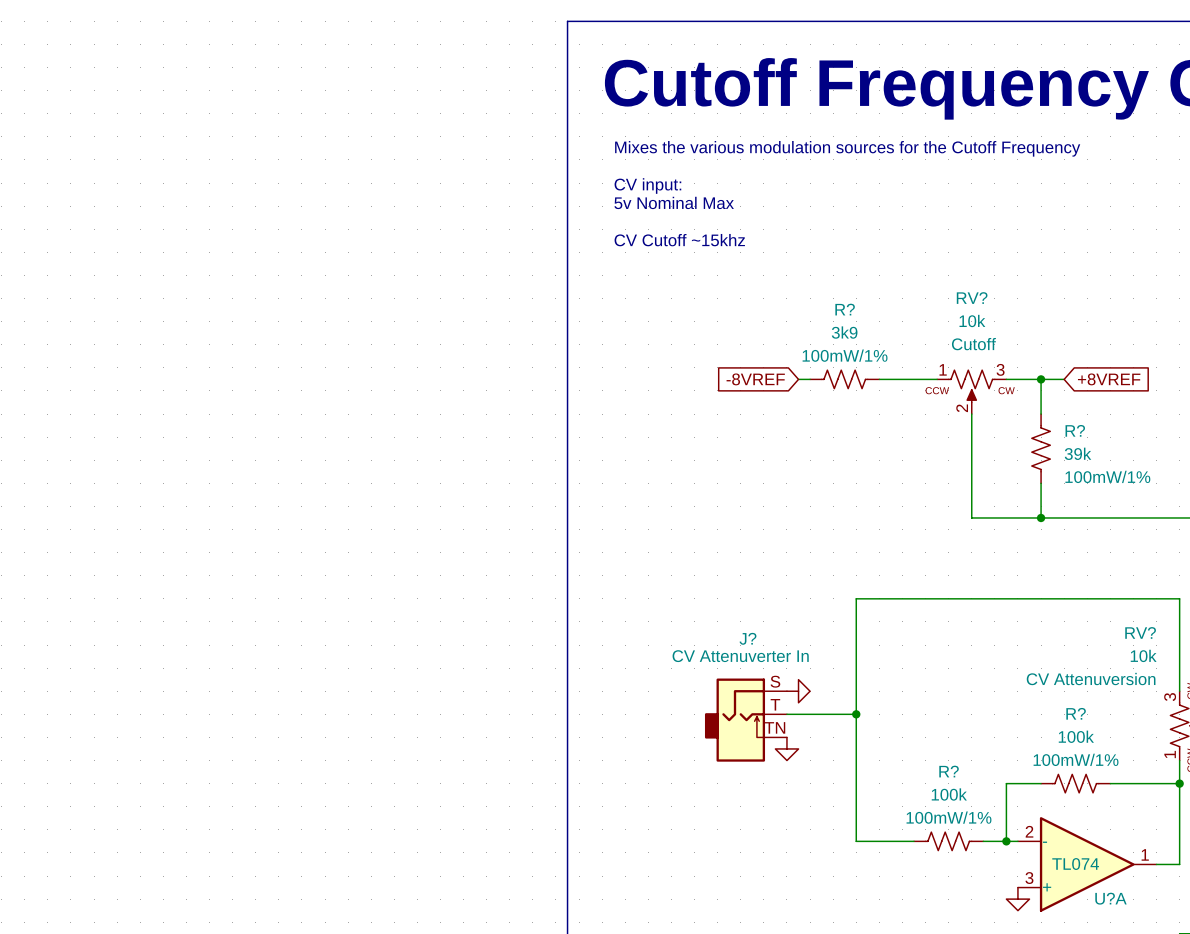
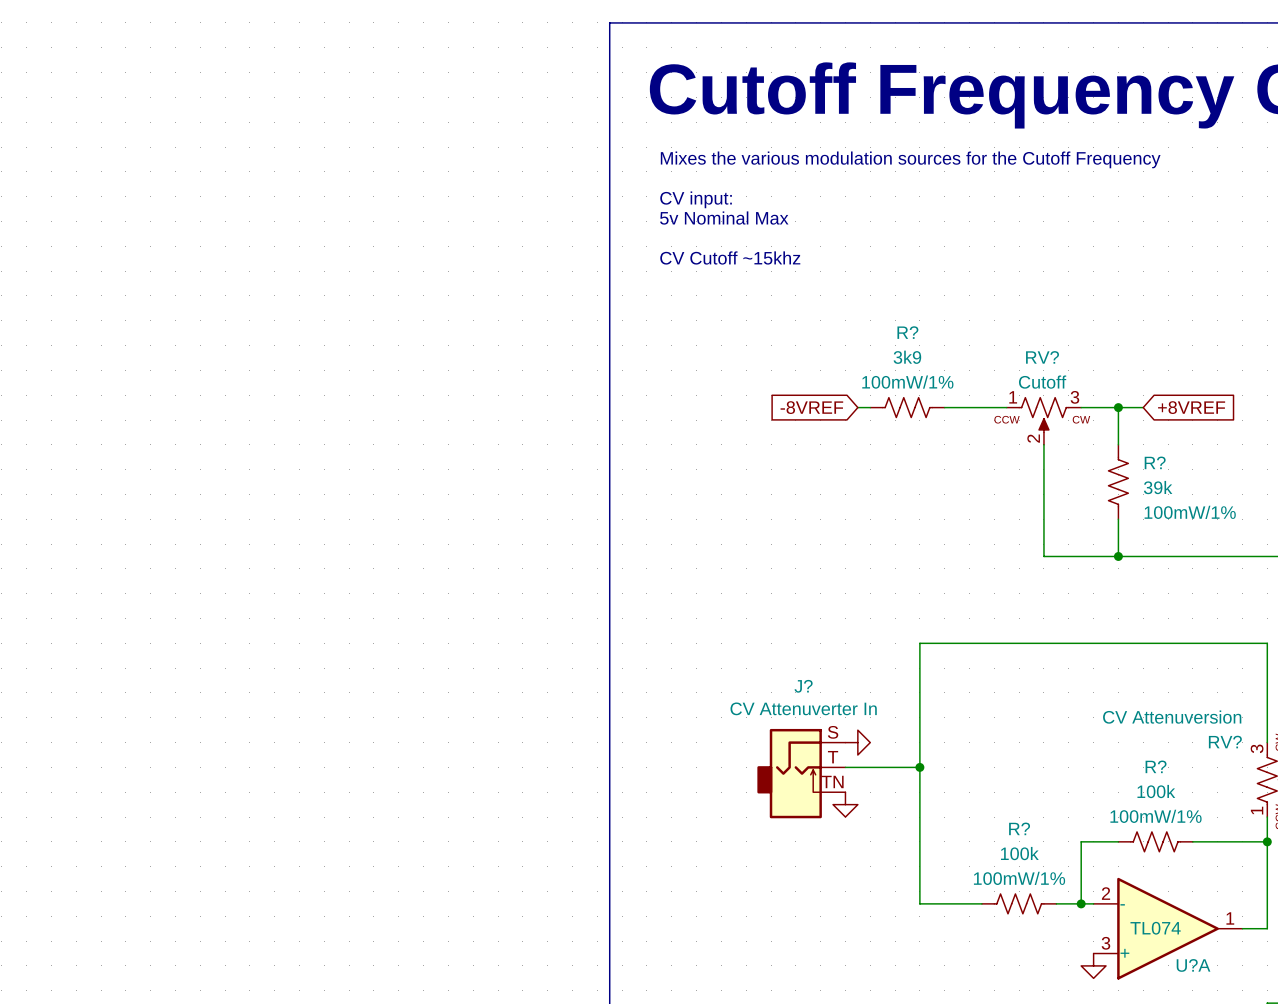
RV? name position: RV? (972, 298) -> RV? (1042, 357)
RV? value: 10k (972, 321) -> Cutoff (1042, 382)
RV? text: Cutoff (973, 344) -> none
RV? name position: RV? (1140, 632) -> RV? (1225, 742)
RV? value: 10k (1143, 655) -> CV Attenuversion (1172, 717)
J? text: CV Attenuverter In (740, 656) -> none
J? value: none -> CV Attenuverter In (803, 708)
RV? text: CV Attenuversion (1091, 679) -> none

